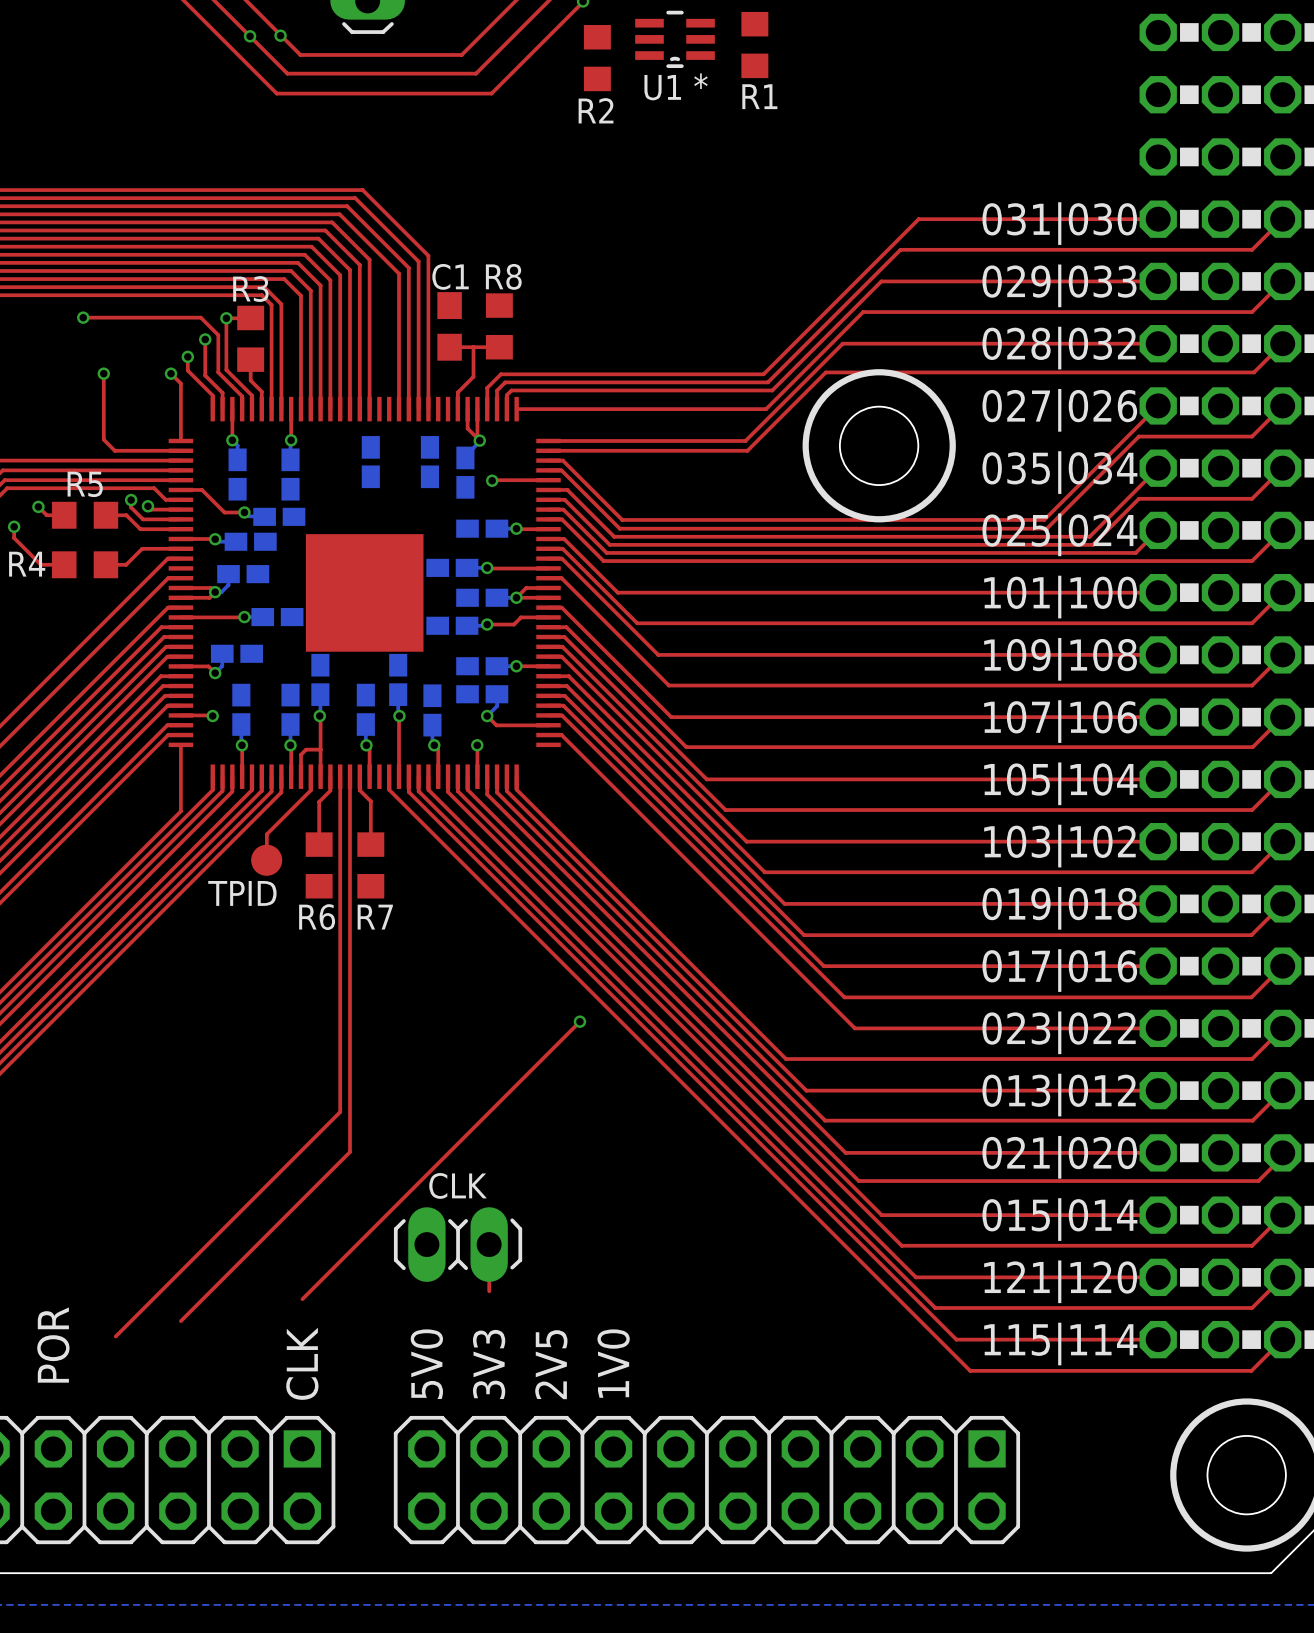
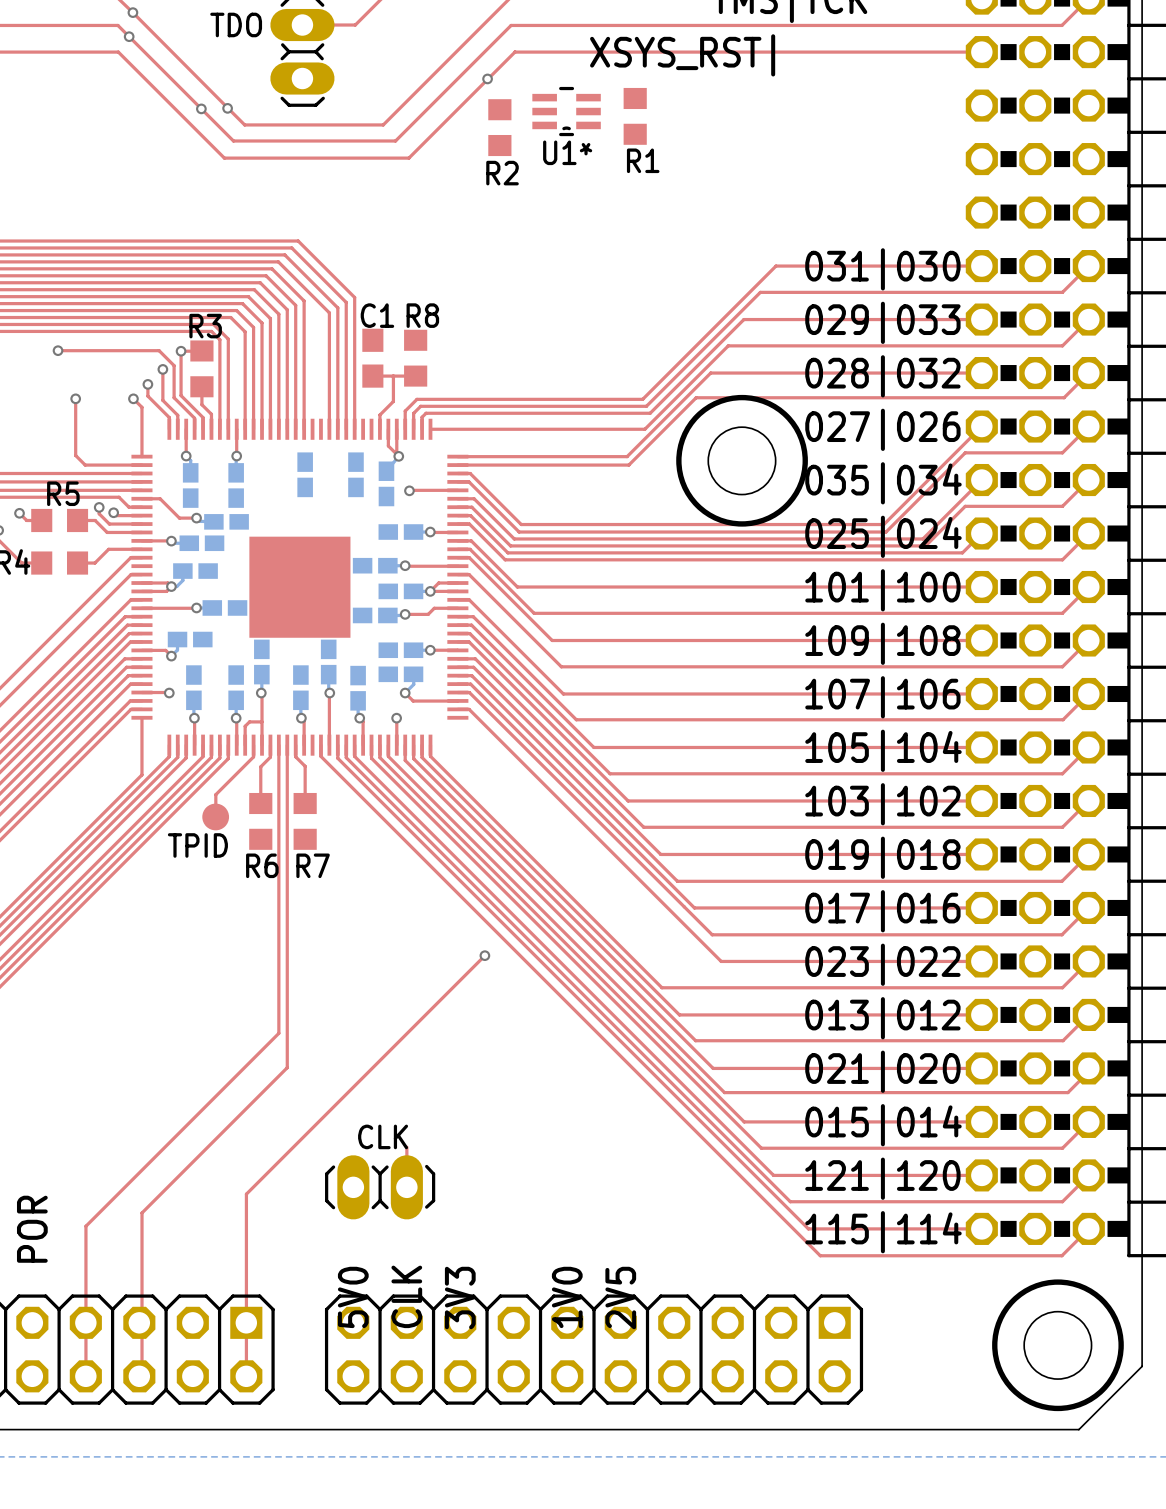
CLK position: (458, 1244) -> (380, 1187)
top track: none -> (246, 1194) (246, 1376)
top track: none -> (142, 1212) (142, 1374) (139, 1376)
top track: none -> (85, 1226) (85, 1376)
text position: CLK (302, 1363) -> CLK (406, 1296)
text position: 1V0 (613, 1363) -> 1V0 (567, 1297)
text position: 5V0 (426, 1364) -> 5V0 (353, 1297)
text position: 3V3 (489, 1364) -> 3V3 (460, 1298)
text position: 2V5 (551, 1364) -> 2V5 (620, 1298)

